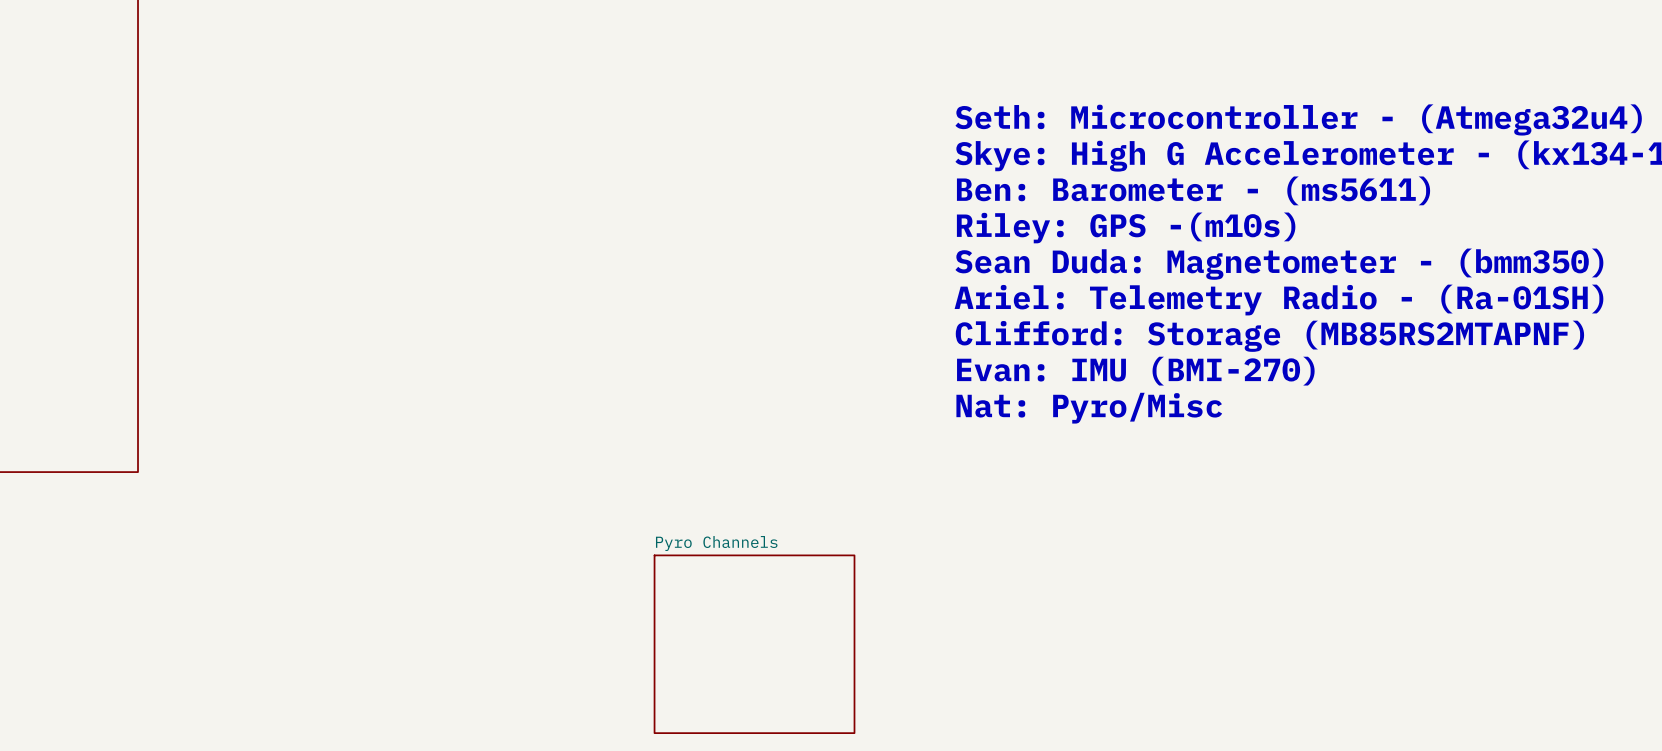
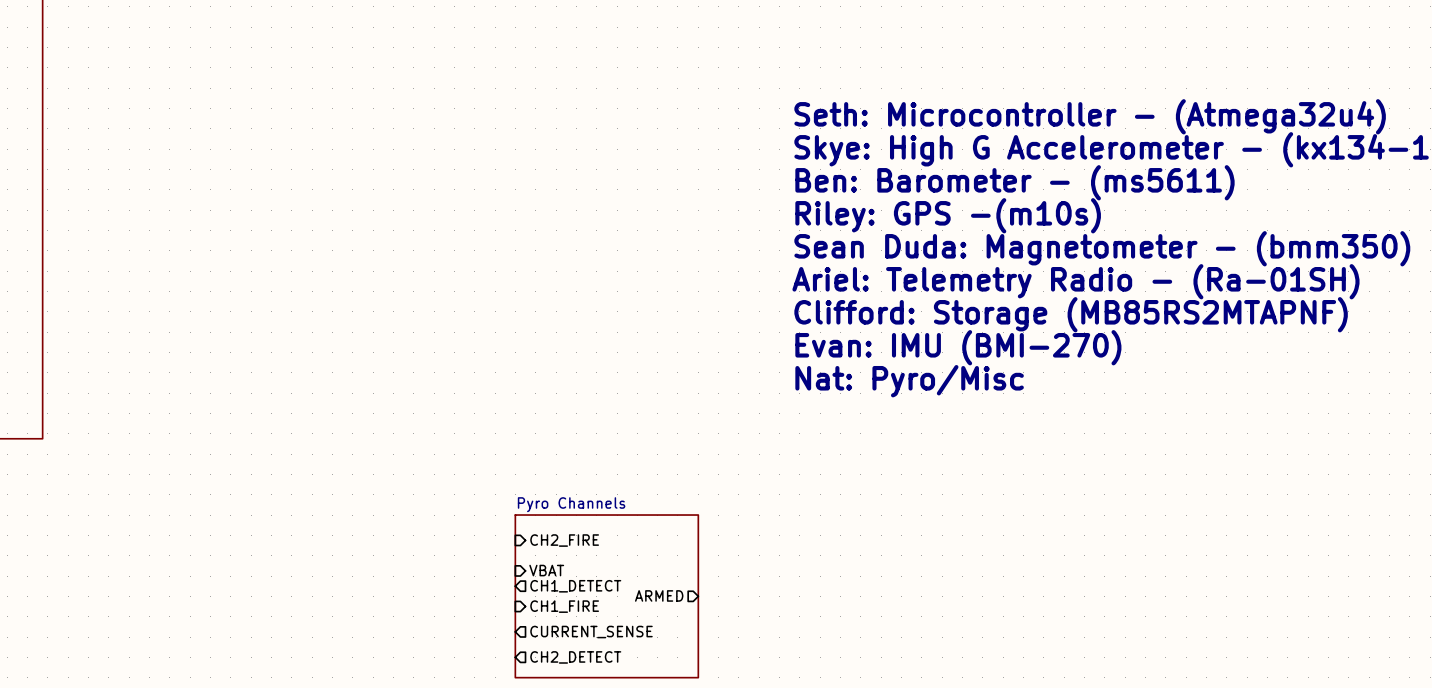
sheet pin: none -> CH2_FIRE (564, 540)
sheet pin: none -> VBAT (546, 570)
sheet pin: none -> CH1_DETECT (575, 586)
sheet pin: none -> ARMED (659, 595)
sheet pin: none -> CH1_FIRE (564, 606)
sheet pin: none -> CURRENT_SENSE (591, 632)
sheet pin: none -> CH2_DETECT (575, 657)

